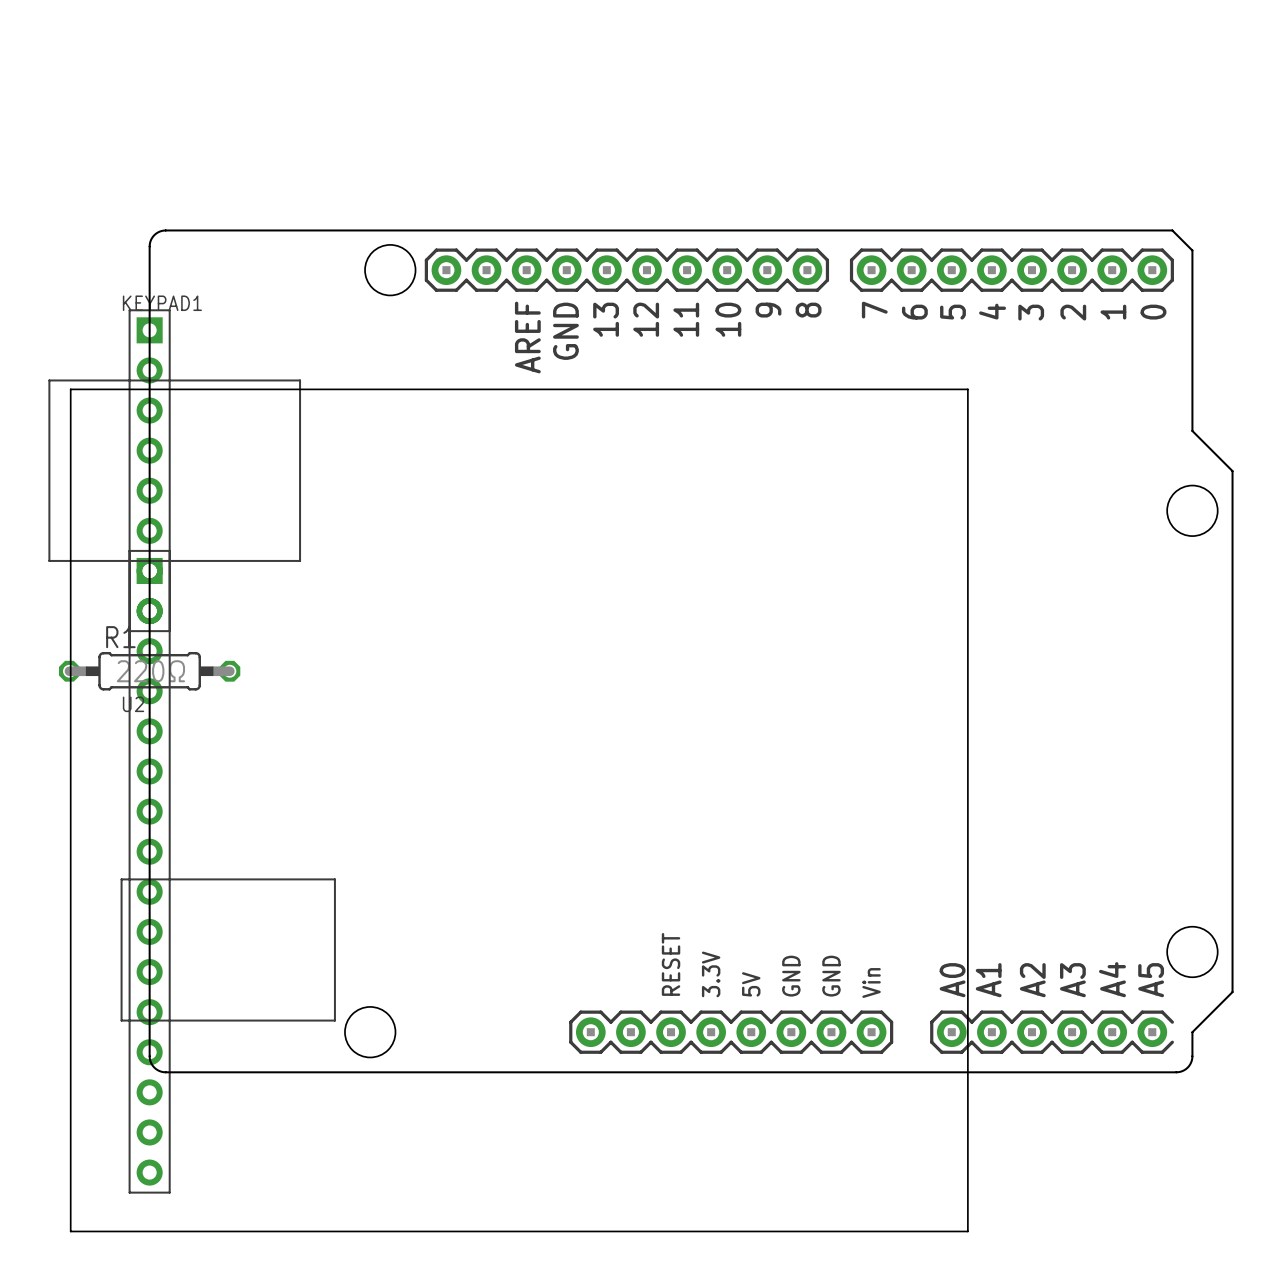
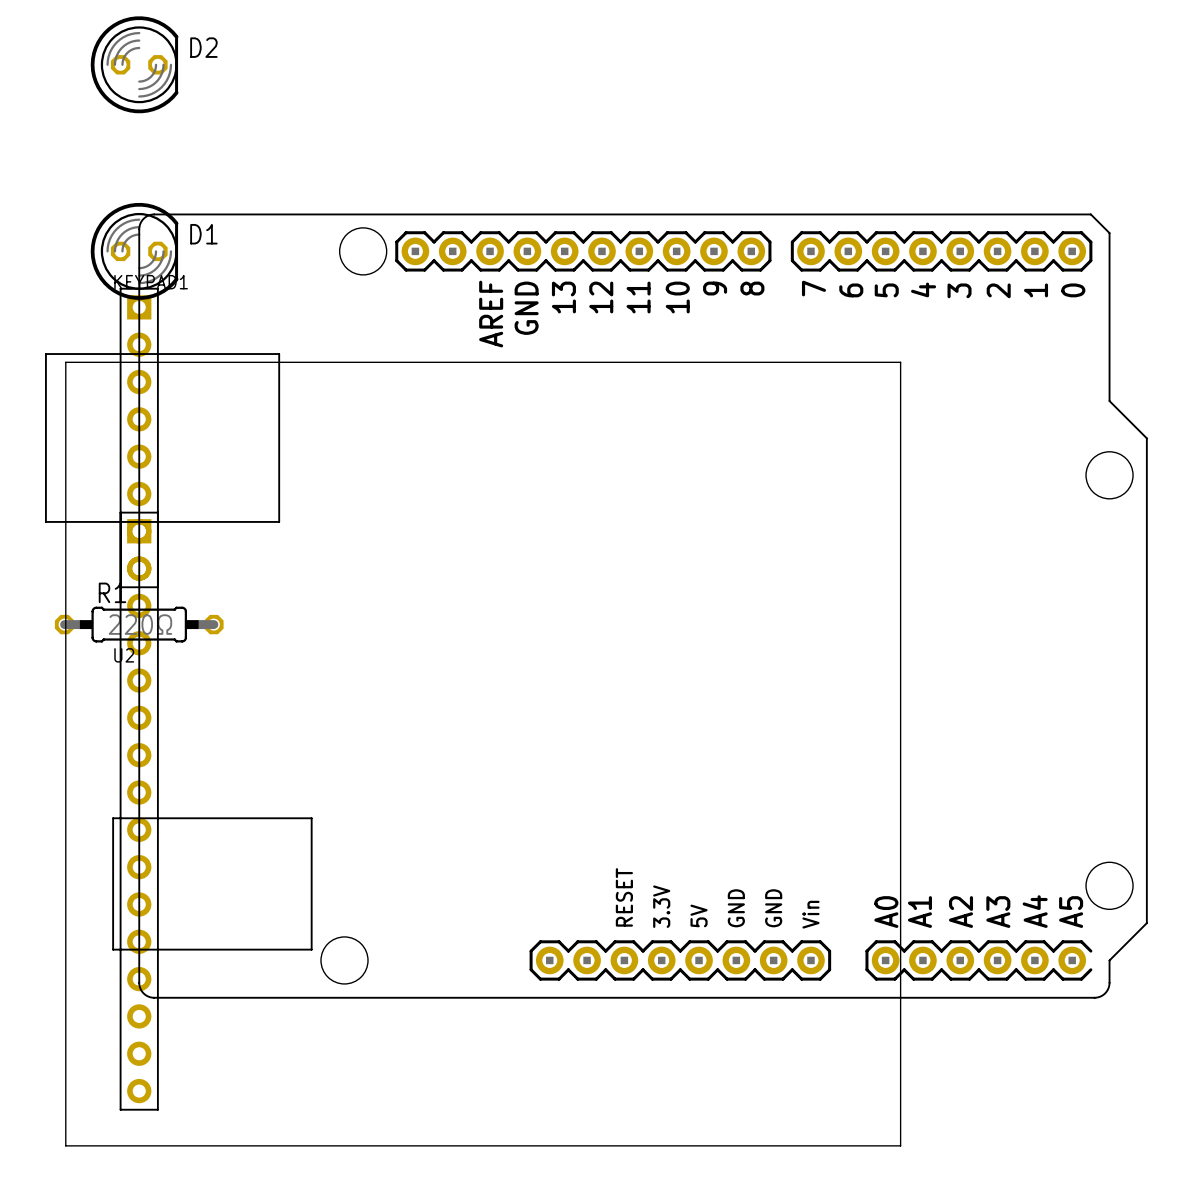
D2: none -> (134, 64)
D1: none -> (134, 251)

